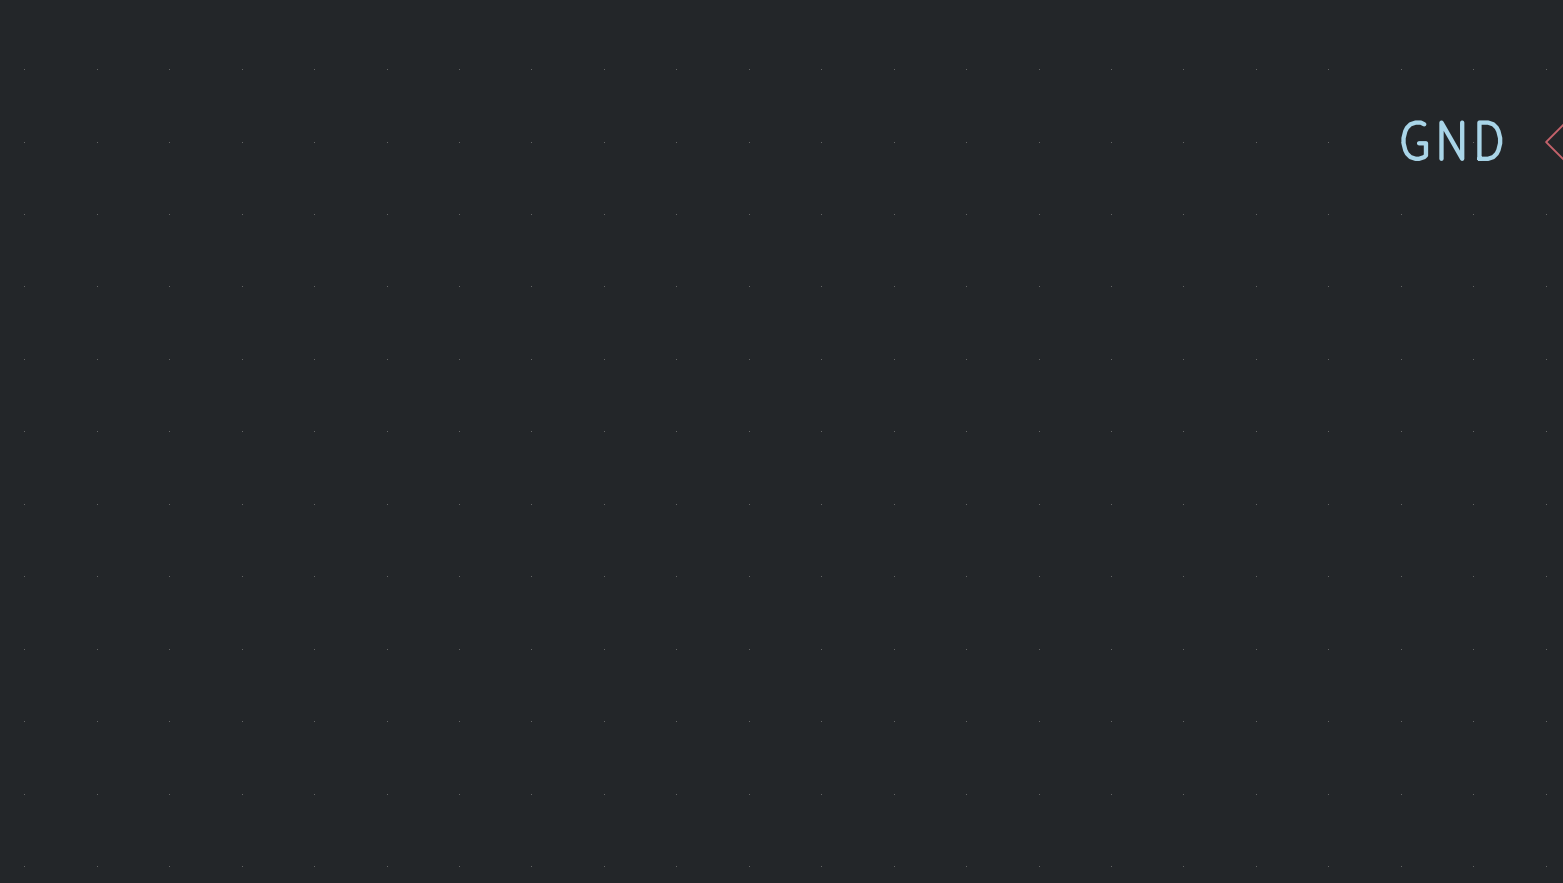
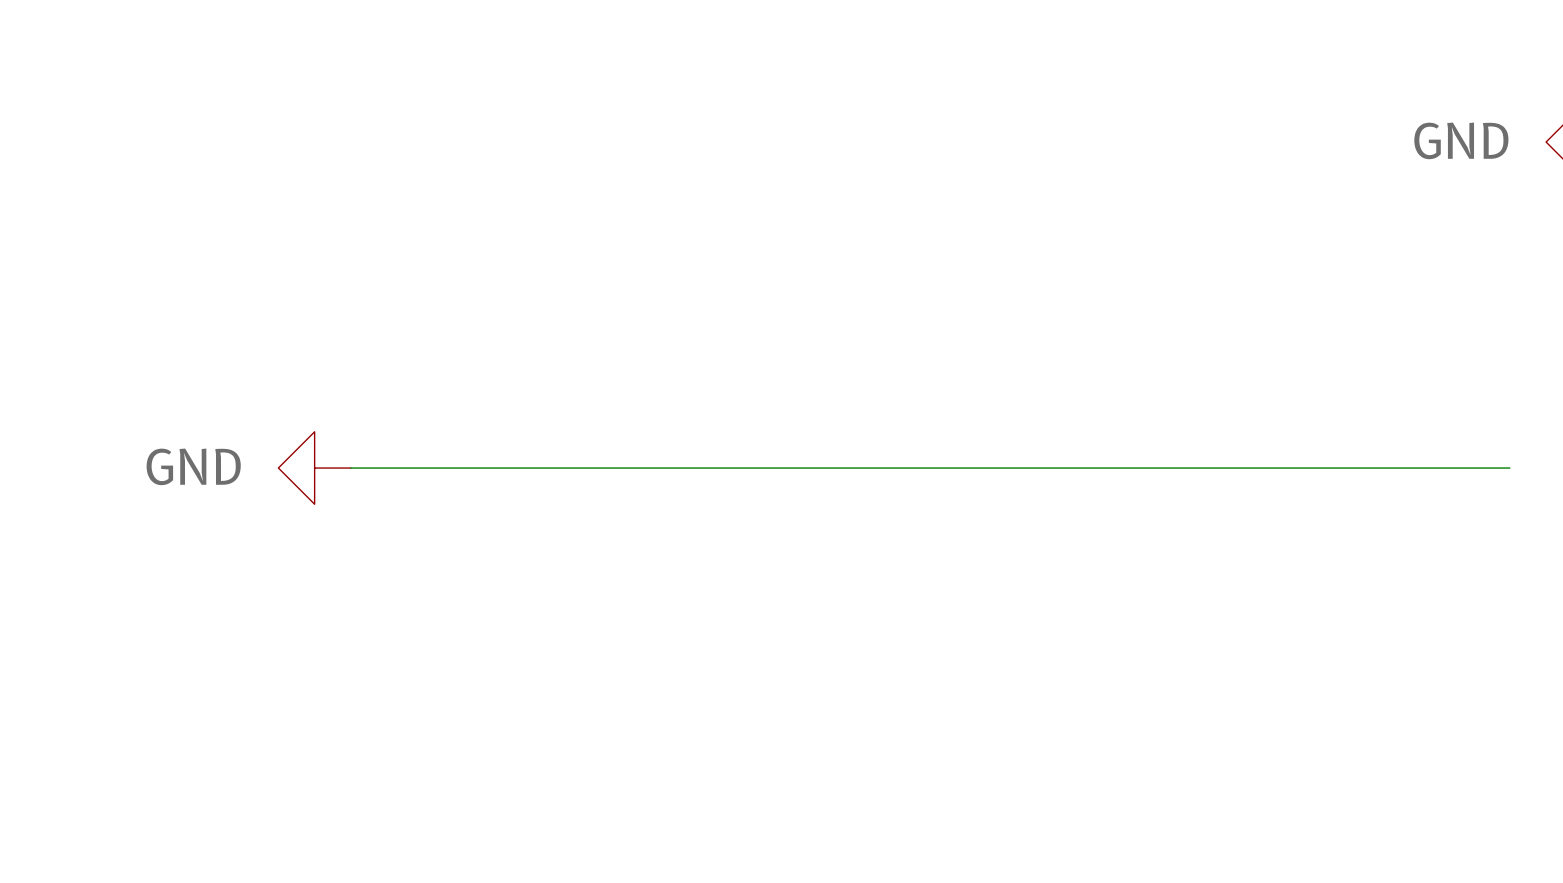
power symbol: none -> GND (314, 468)
wire: none -> (350, 468) (1509, 468)

